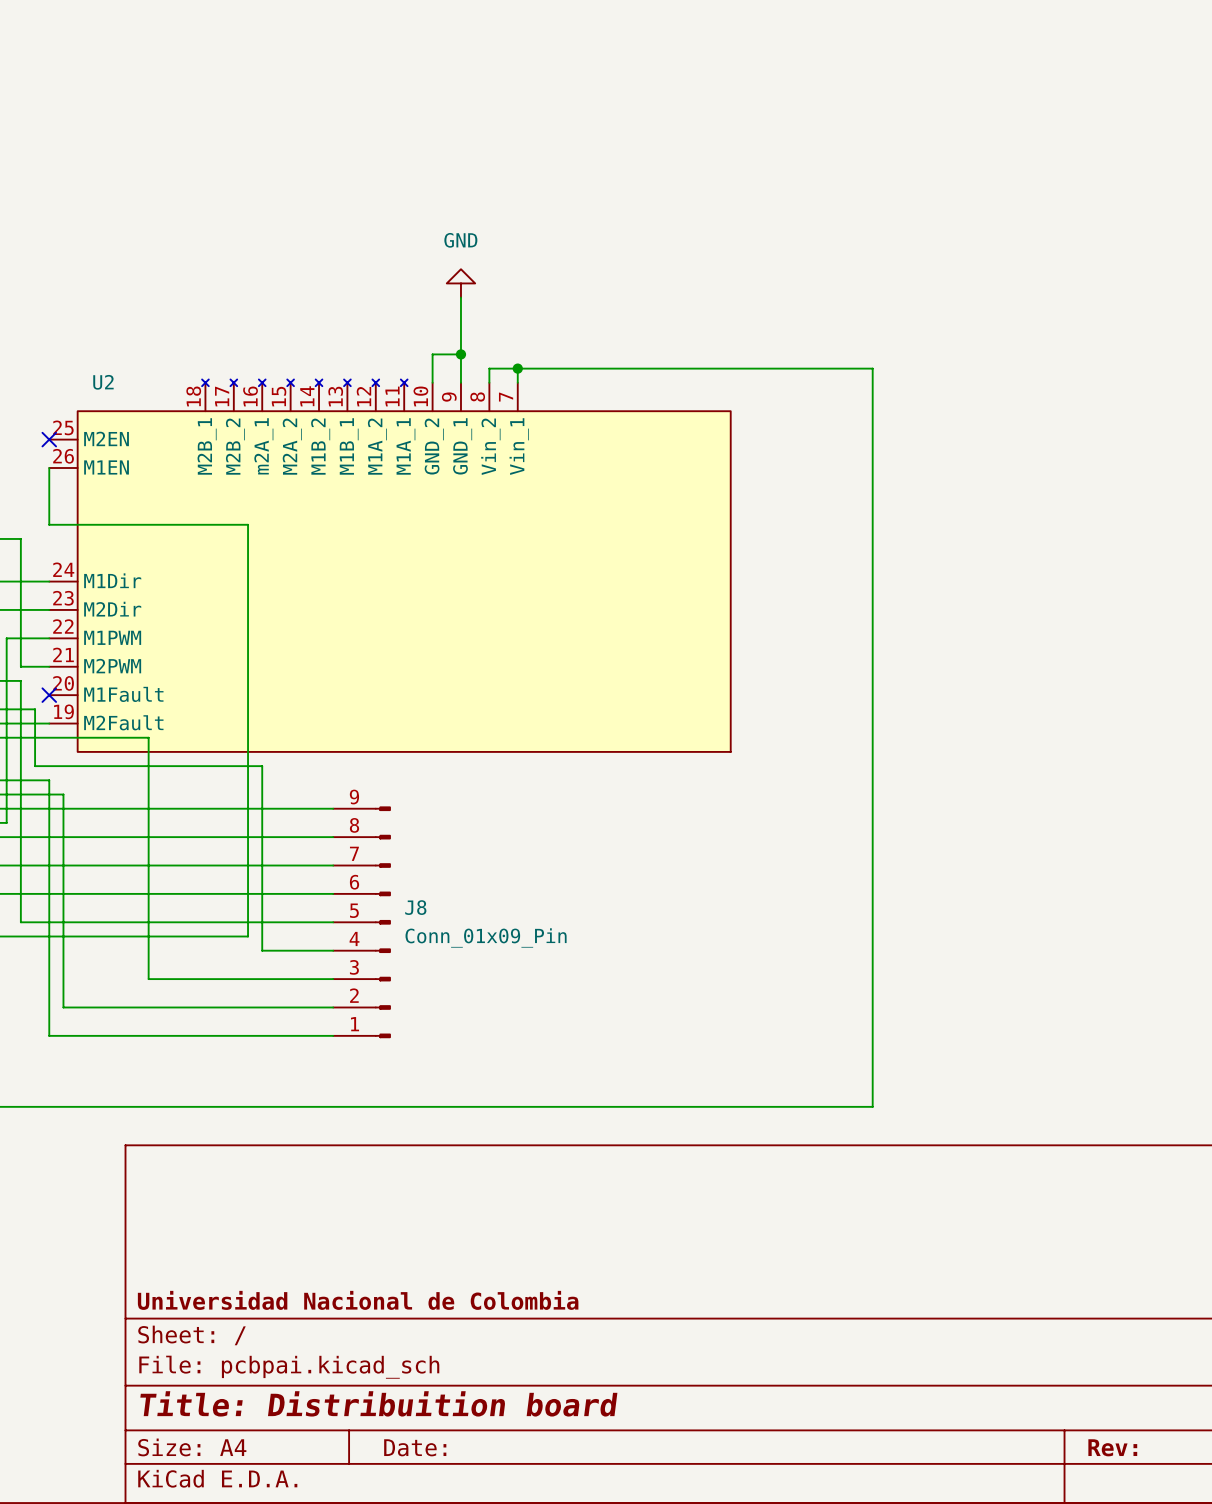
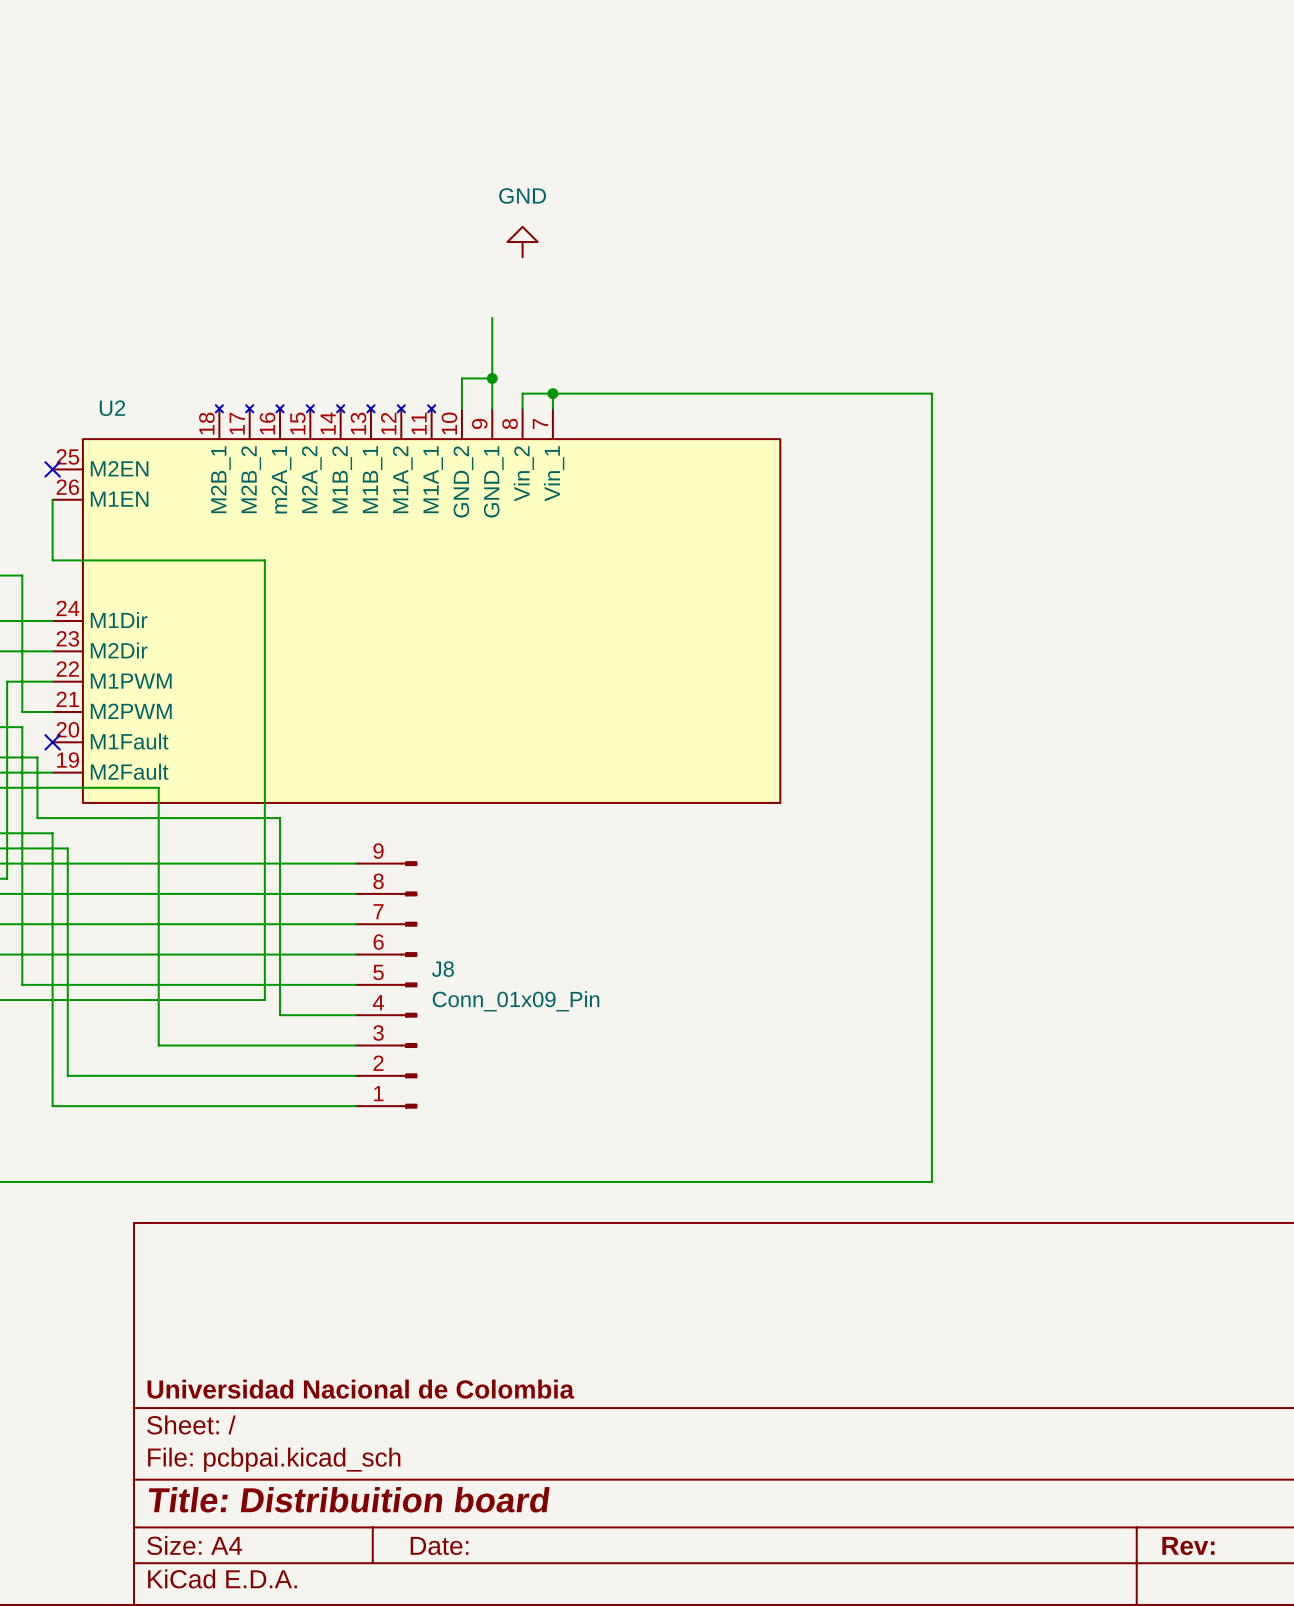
power symbol position: GND (460, 283) -> GND (522, 242)

